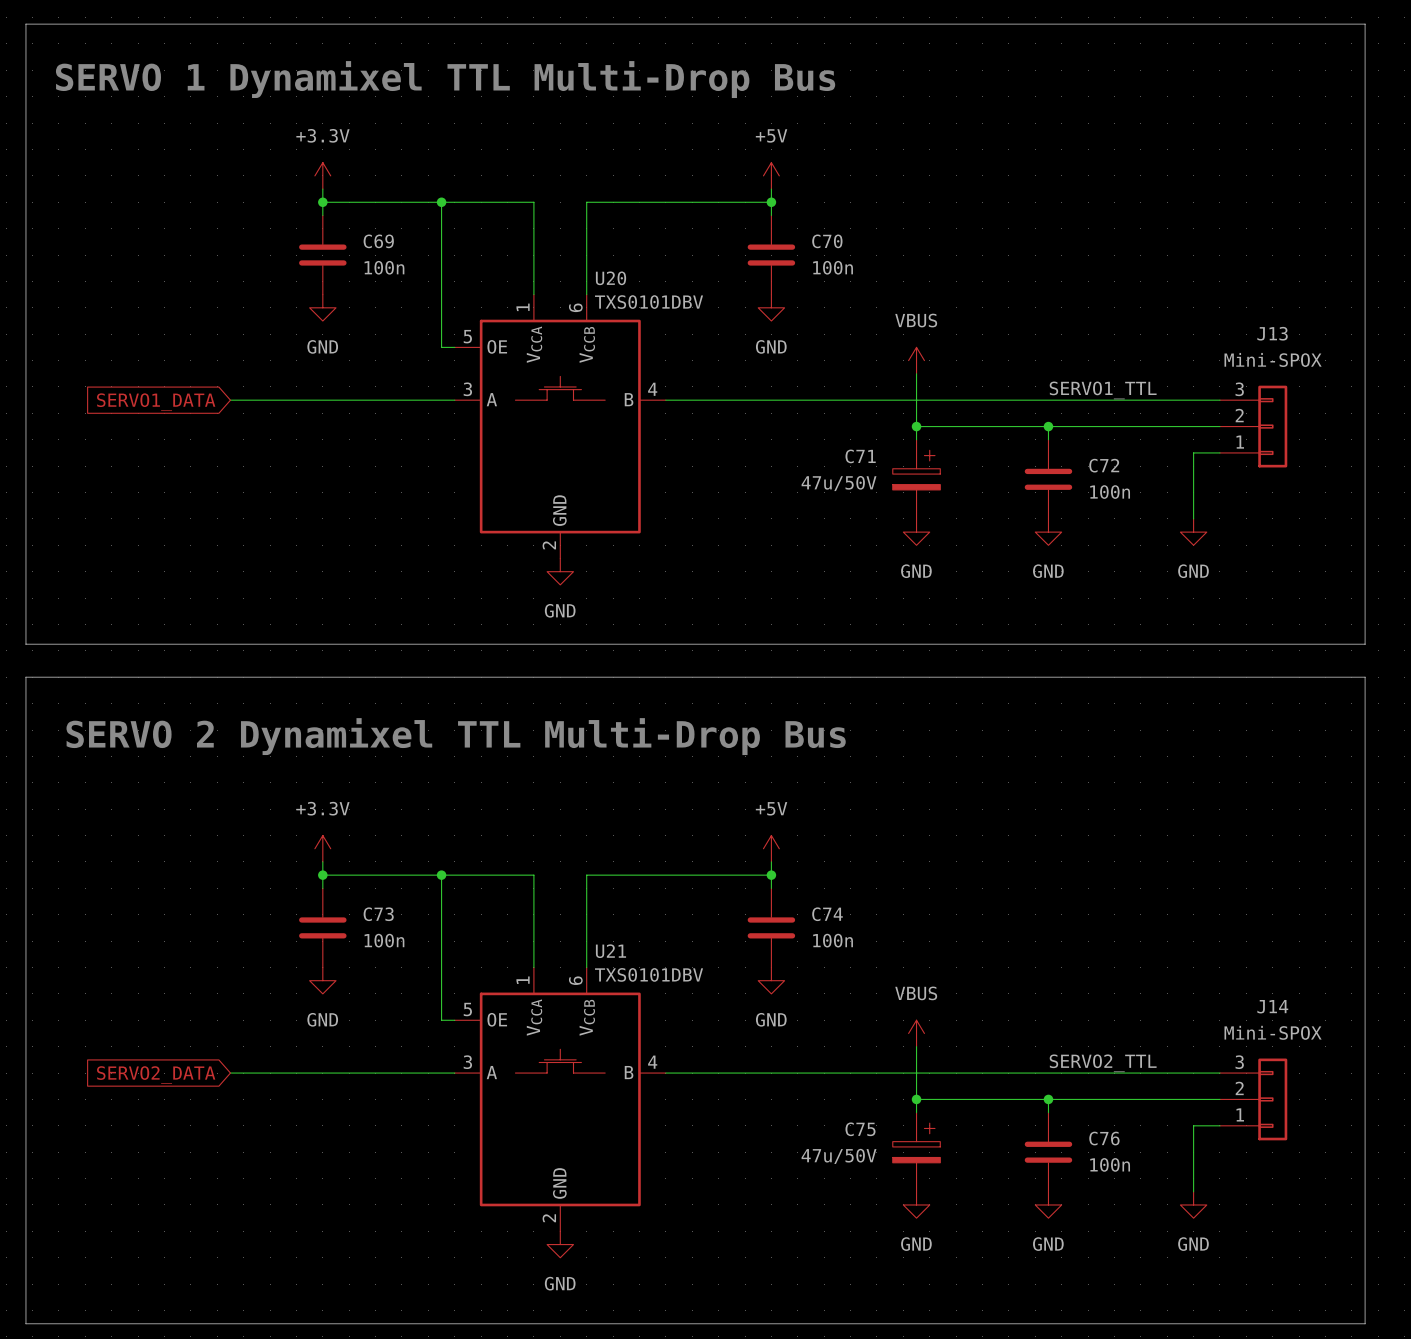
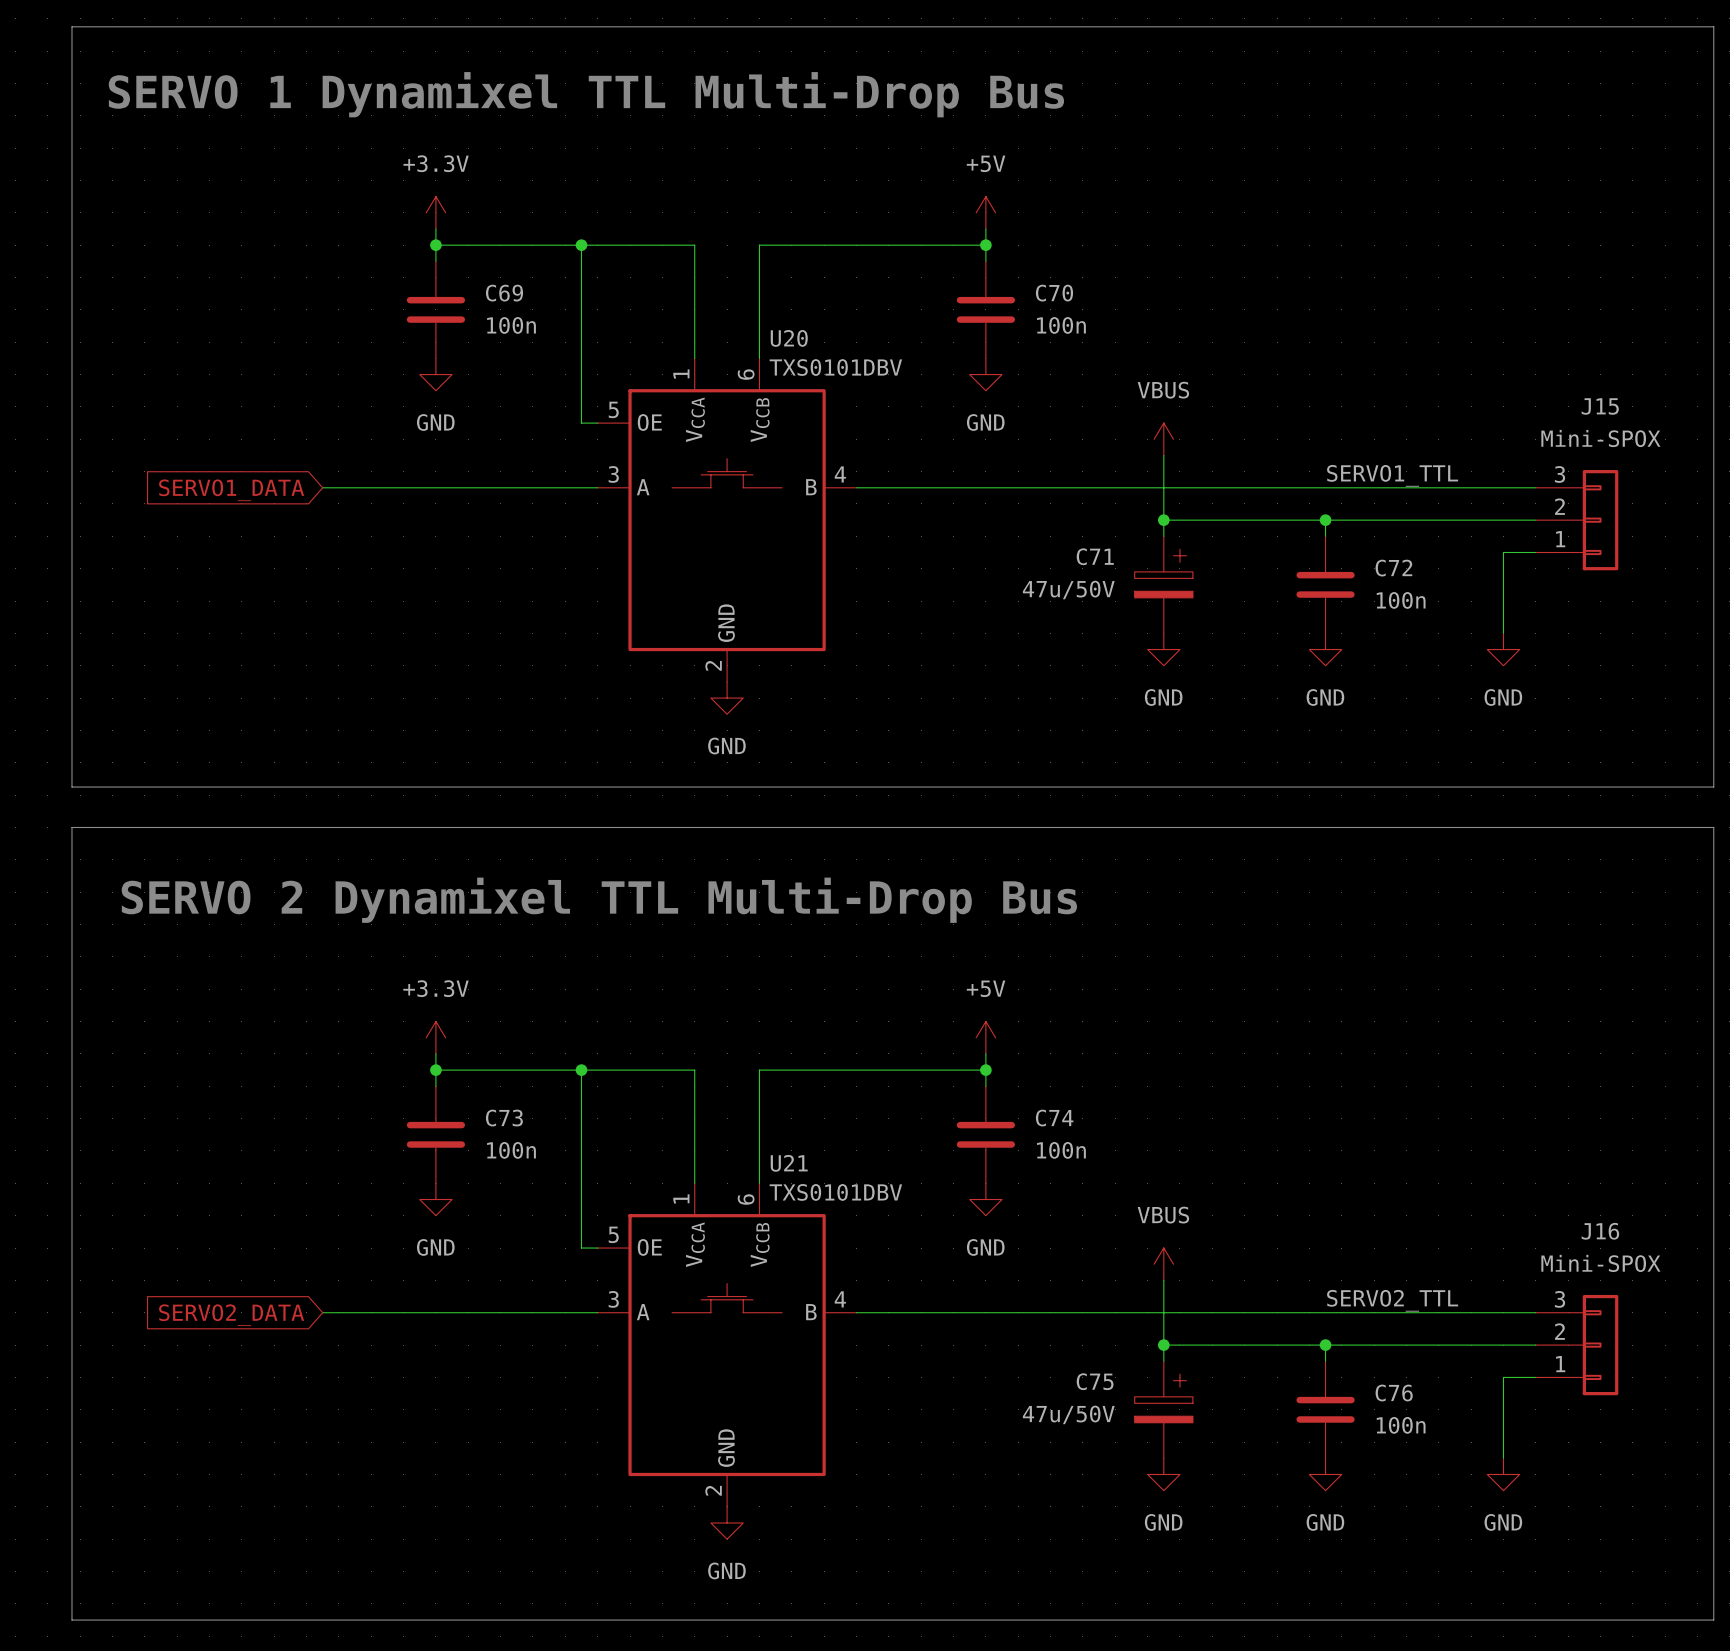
J13 name: J13 (1272, 333) -> J15 (1600, 406)
J14 name: J14 (1272, 1006) -> J16 (1600, 1231)

